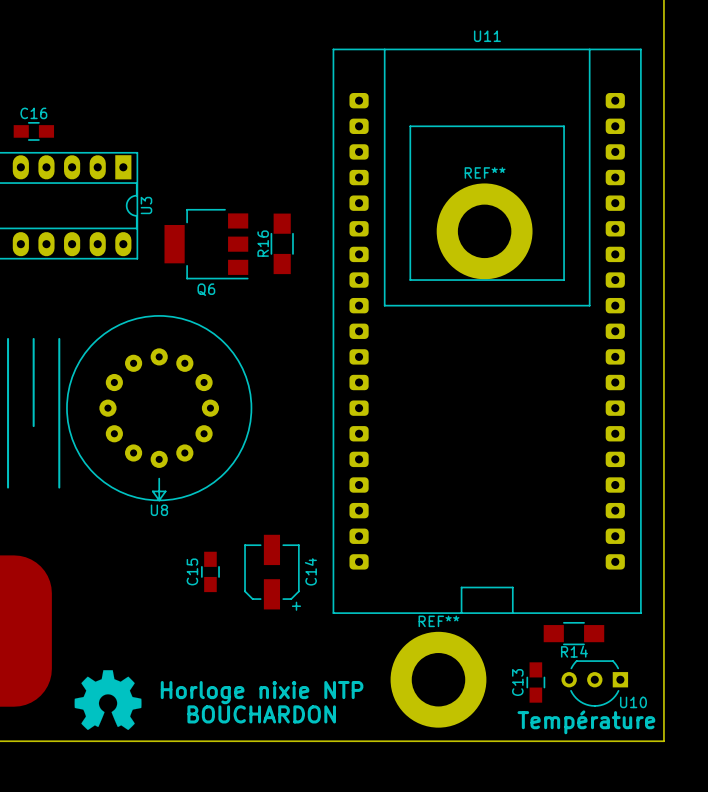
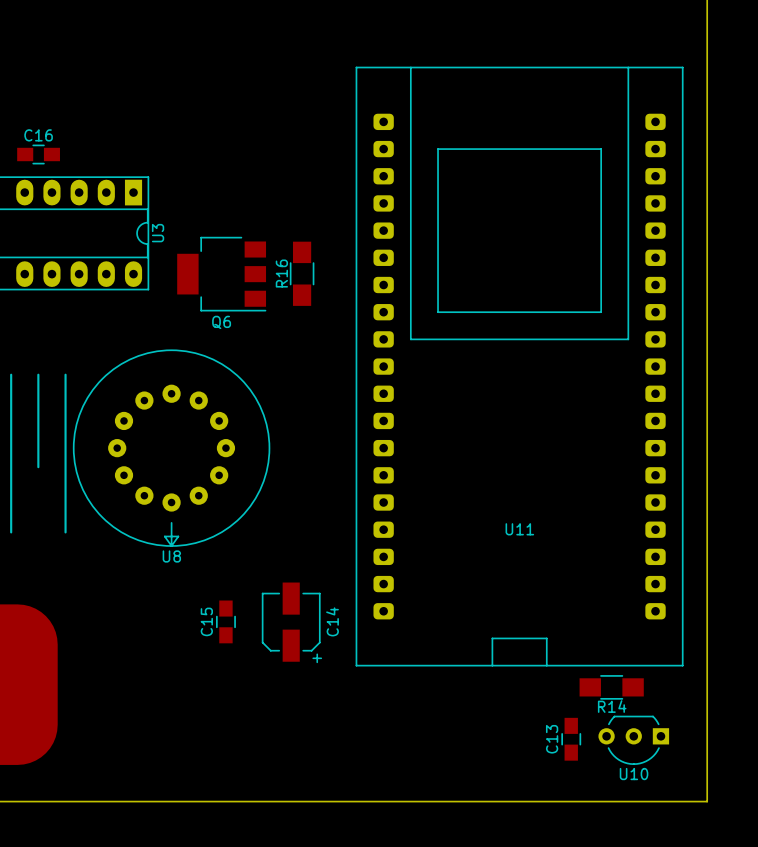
U11 name position: U11 (487, 36) -> U11 (519, 529)
REF**: (484, 231) -> none
drawing: [74, 670, 142, 731] -> none
REF**: (438, 679) -> none
text: Horloge nixie NTP (262, 692) -> none
U10 name position: U10 (633, 702) -> U10 (634, 774)
text: BOUCHARDON (261, 714) -> none
text: Température (586, 722) -> none

